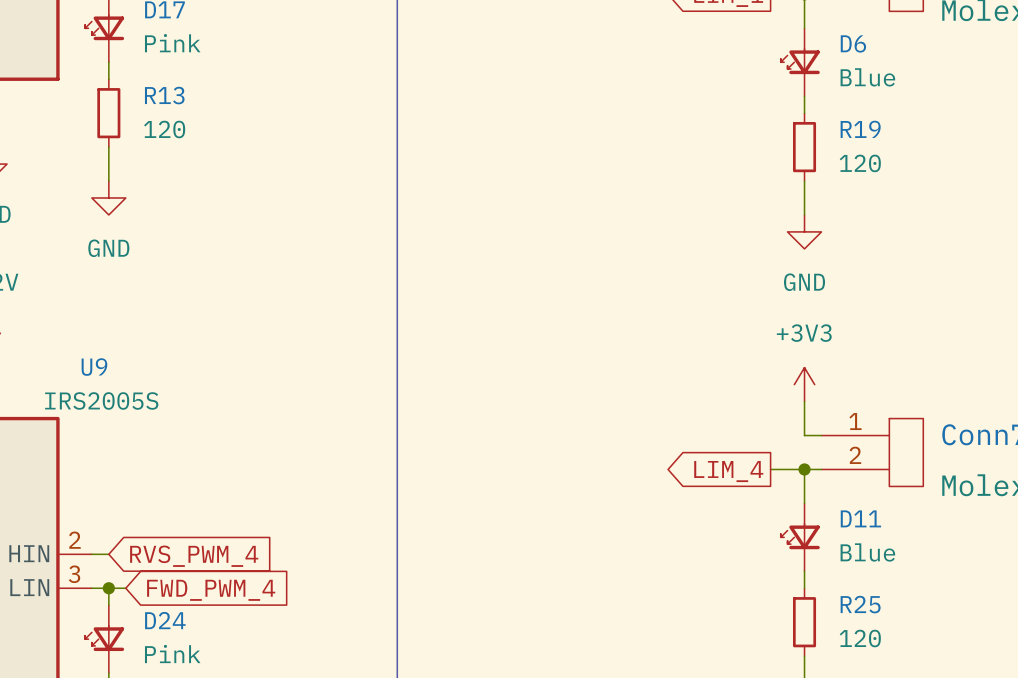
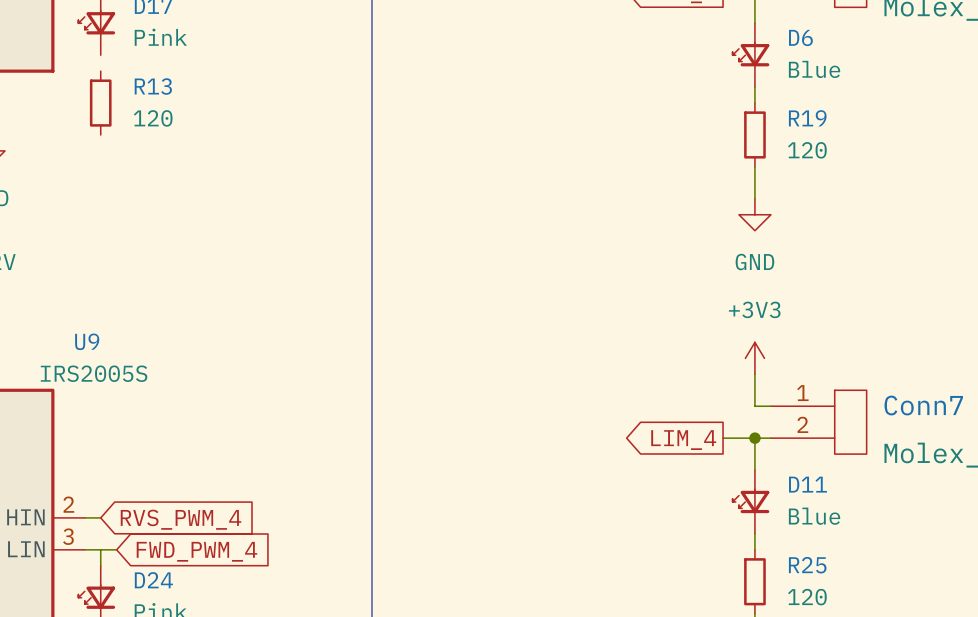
wire: (108, 62) (108, 79) -> none
wire: (108, 147) (108, 181) -> none
power symbol: GND (108, 197) -> none
junction: (108, 588) -> none

